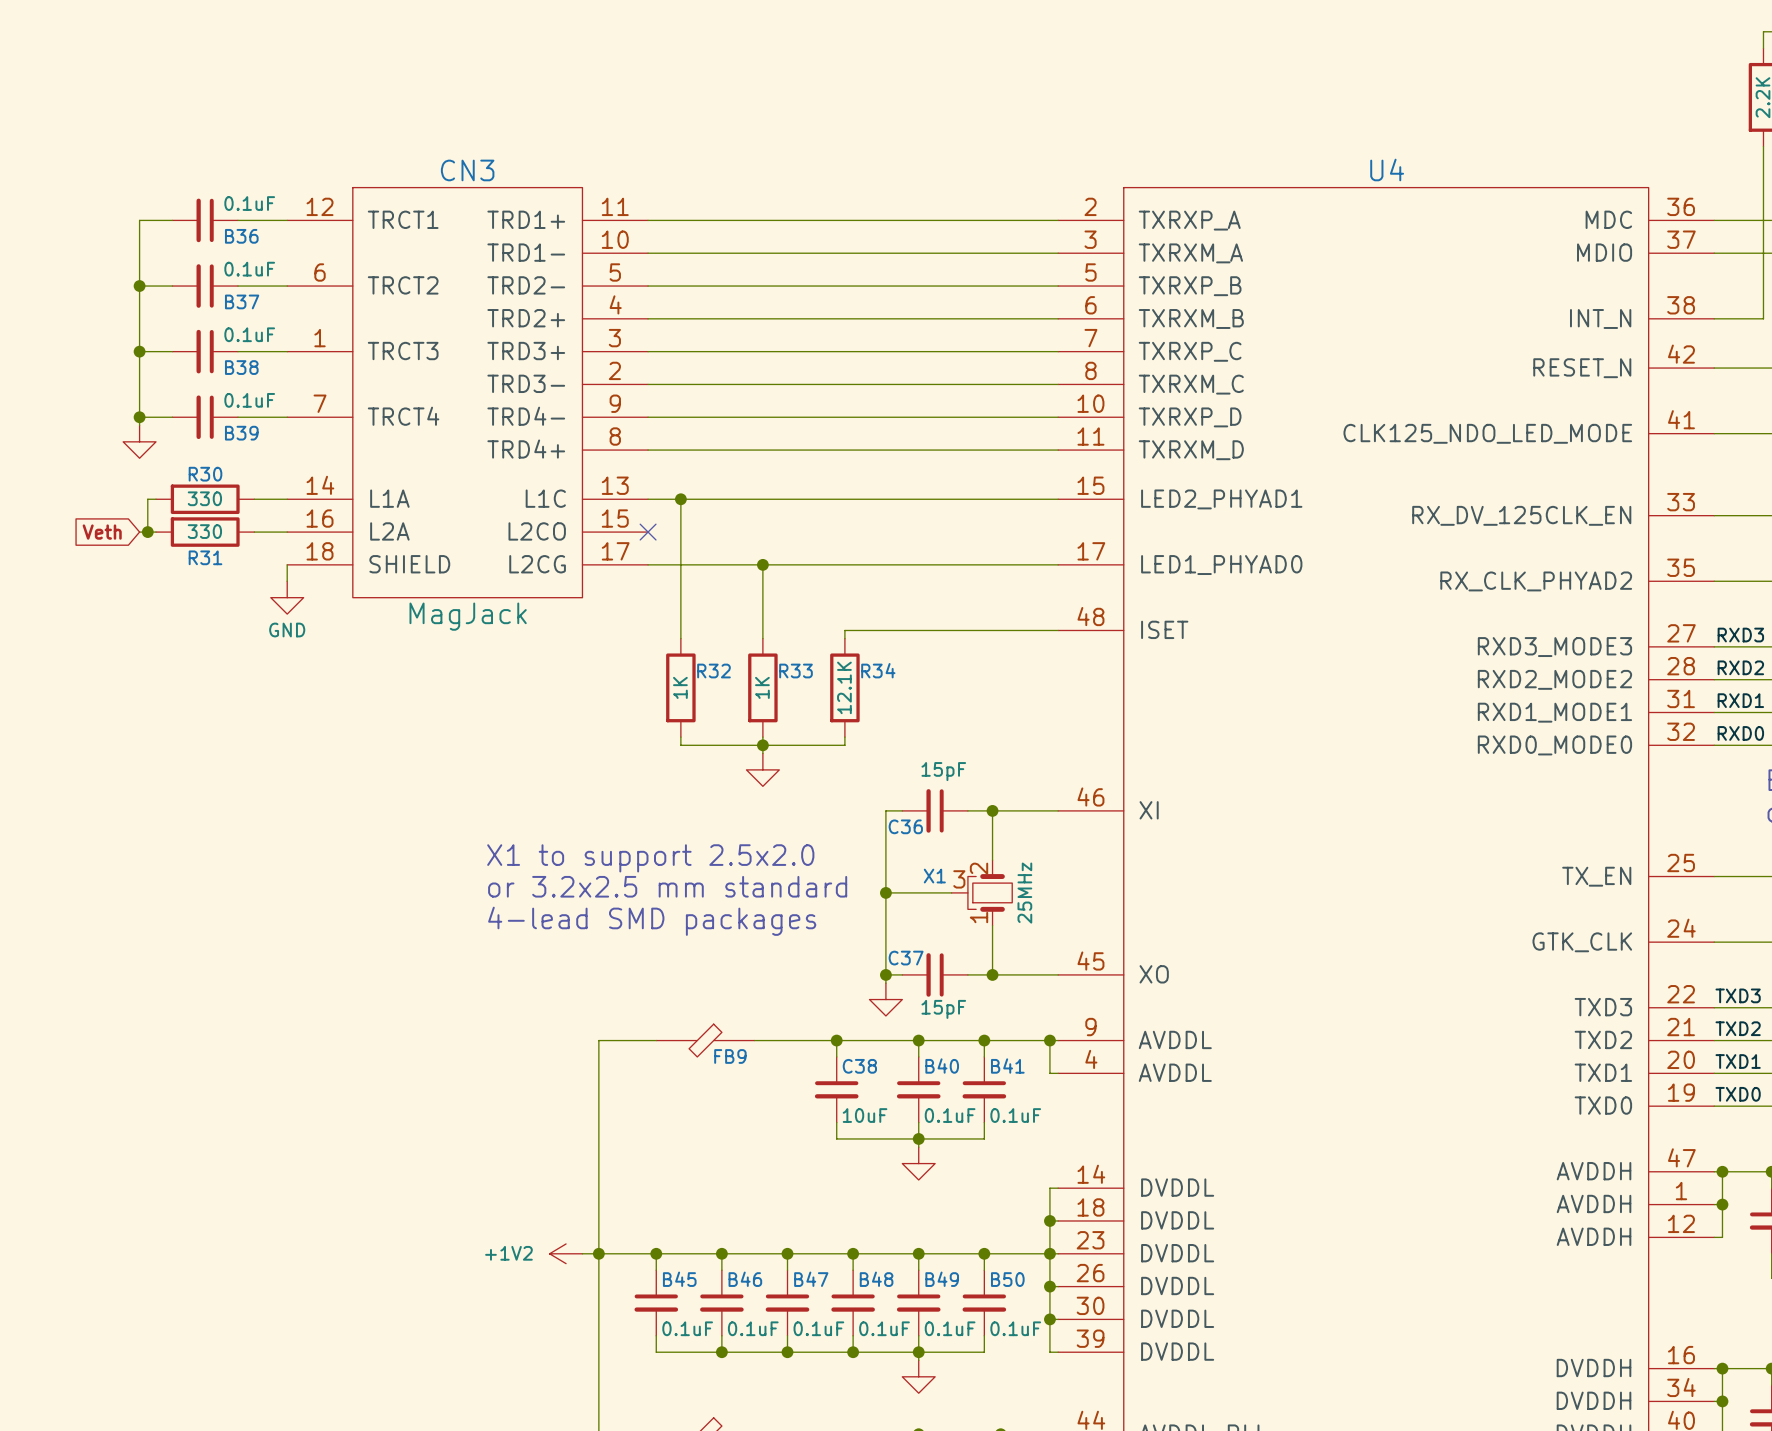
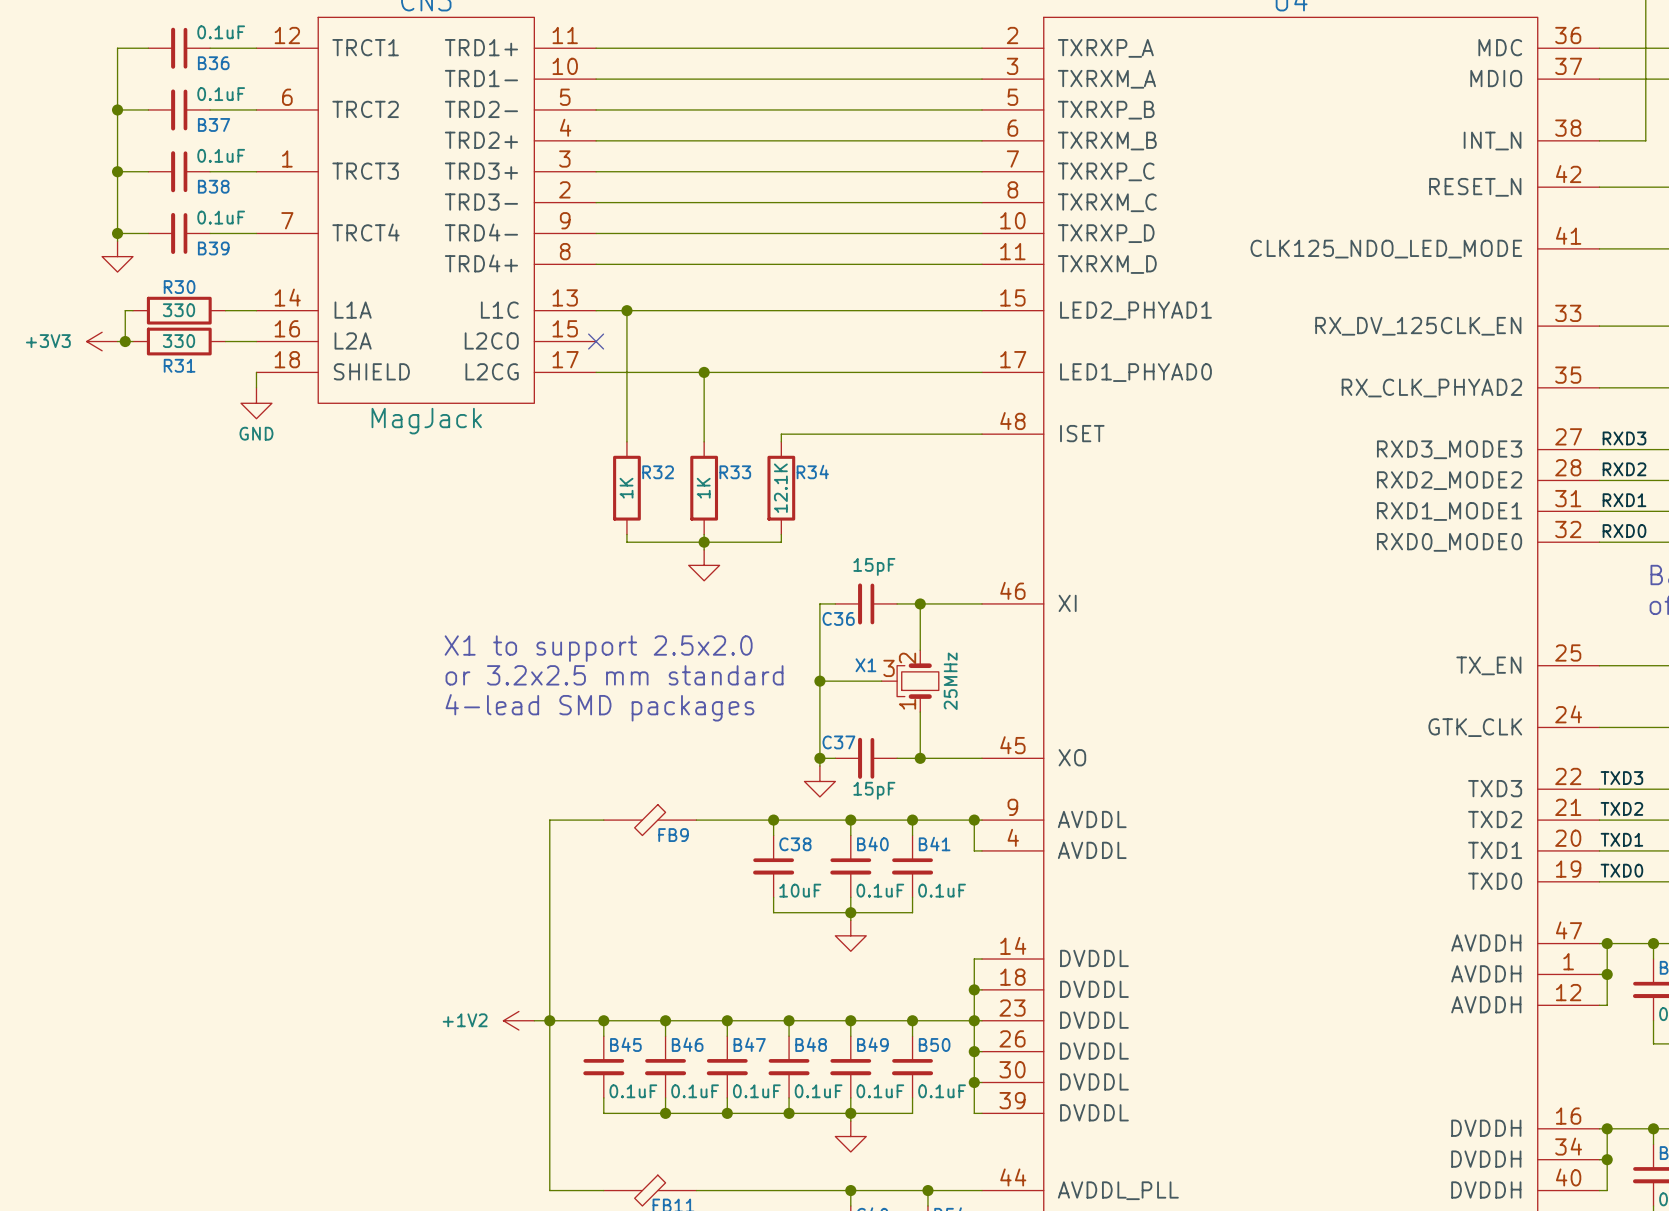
global label: Veth (102, 532) -> none
power symbol: none -> +3V3 (102, 341)

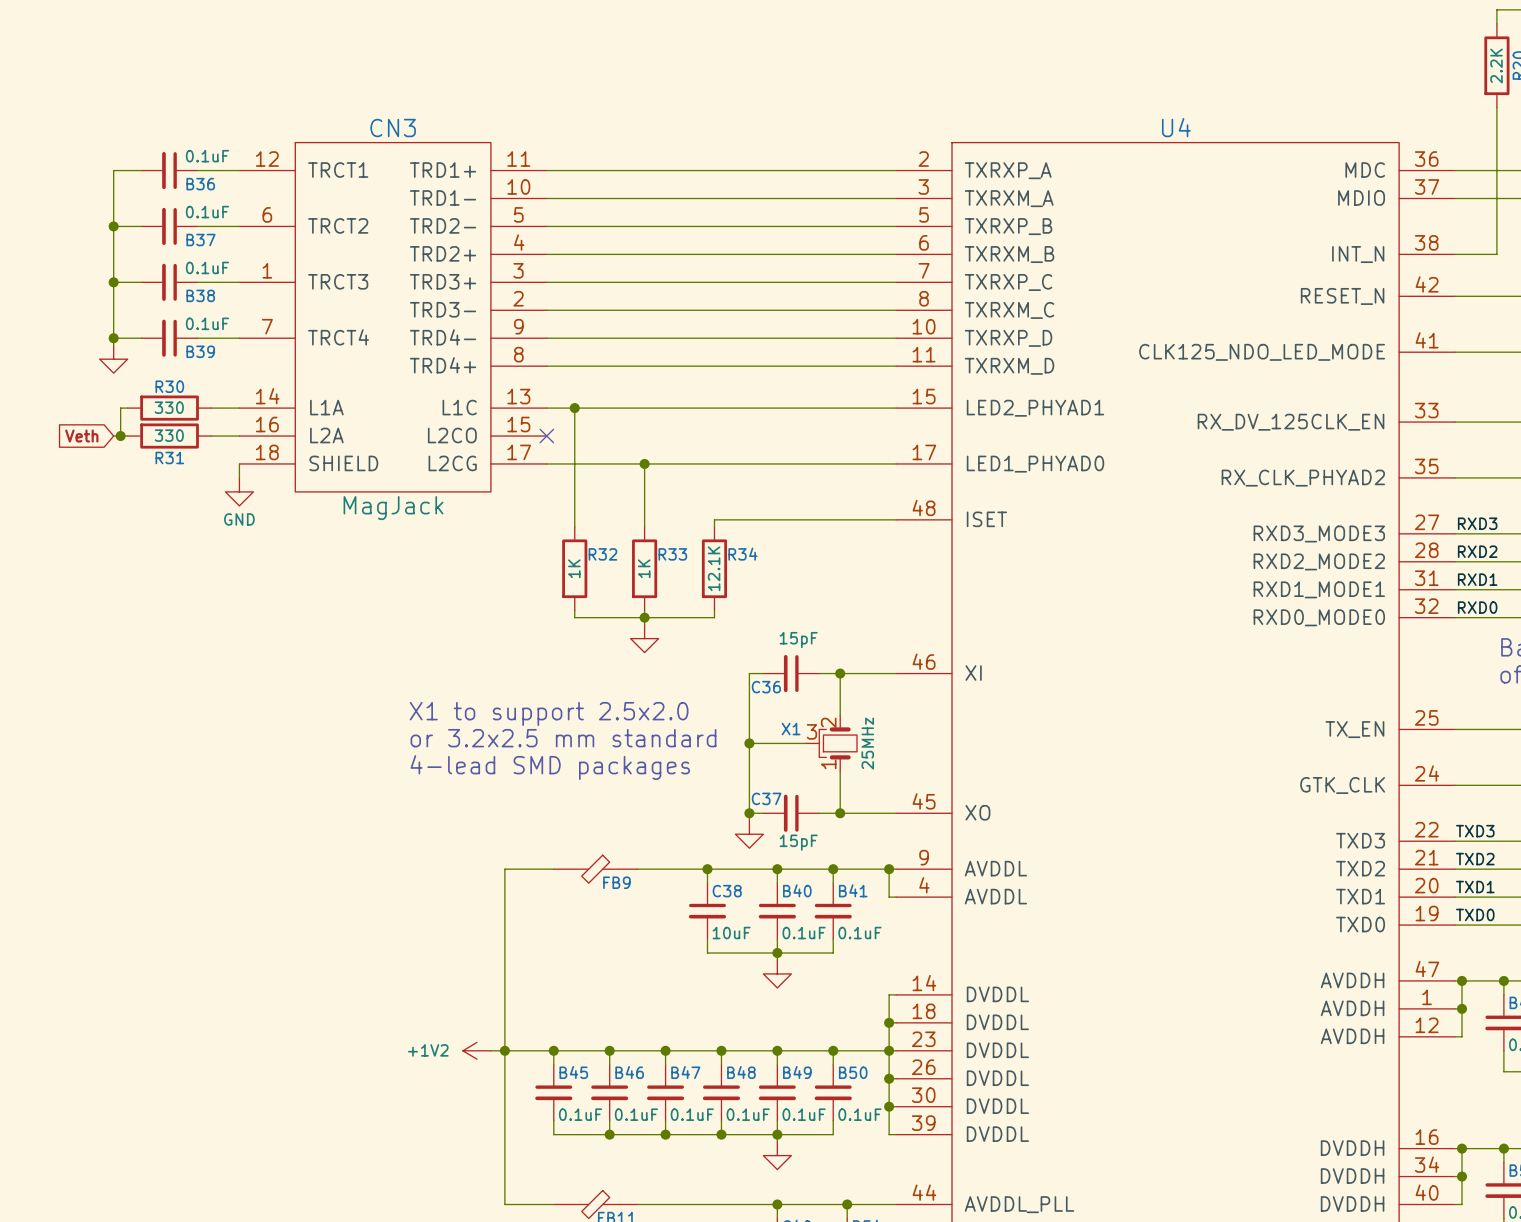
global label: none -> Veth (81, 436)
power symbol: +3V3 (102, 341) -> none

